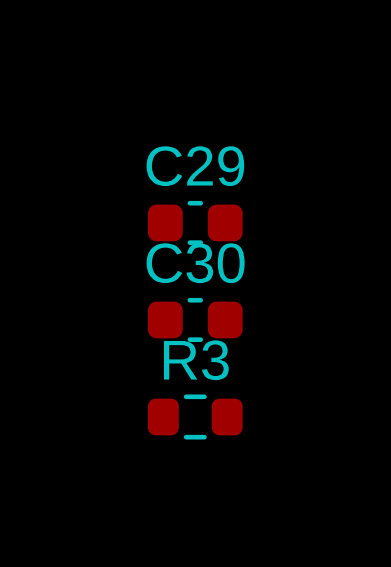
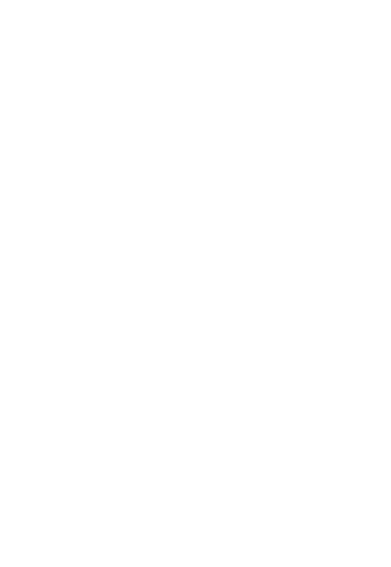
C29: (195, 222) -> none
C30: (195, 319) -> none
R3: (195, 416) -> none

